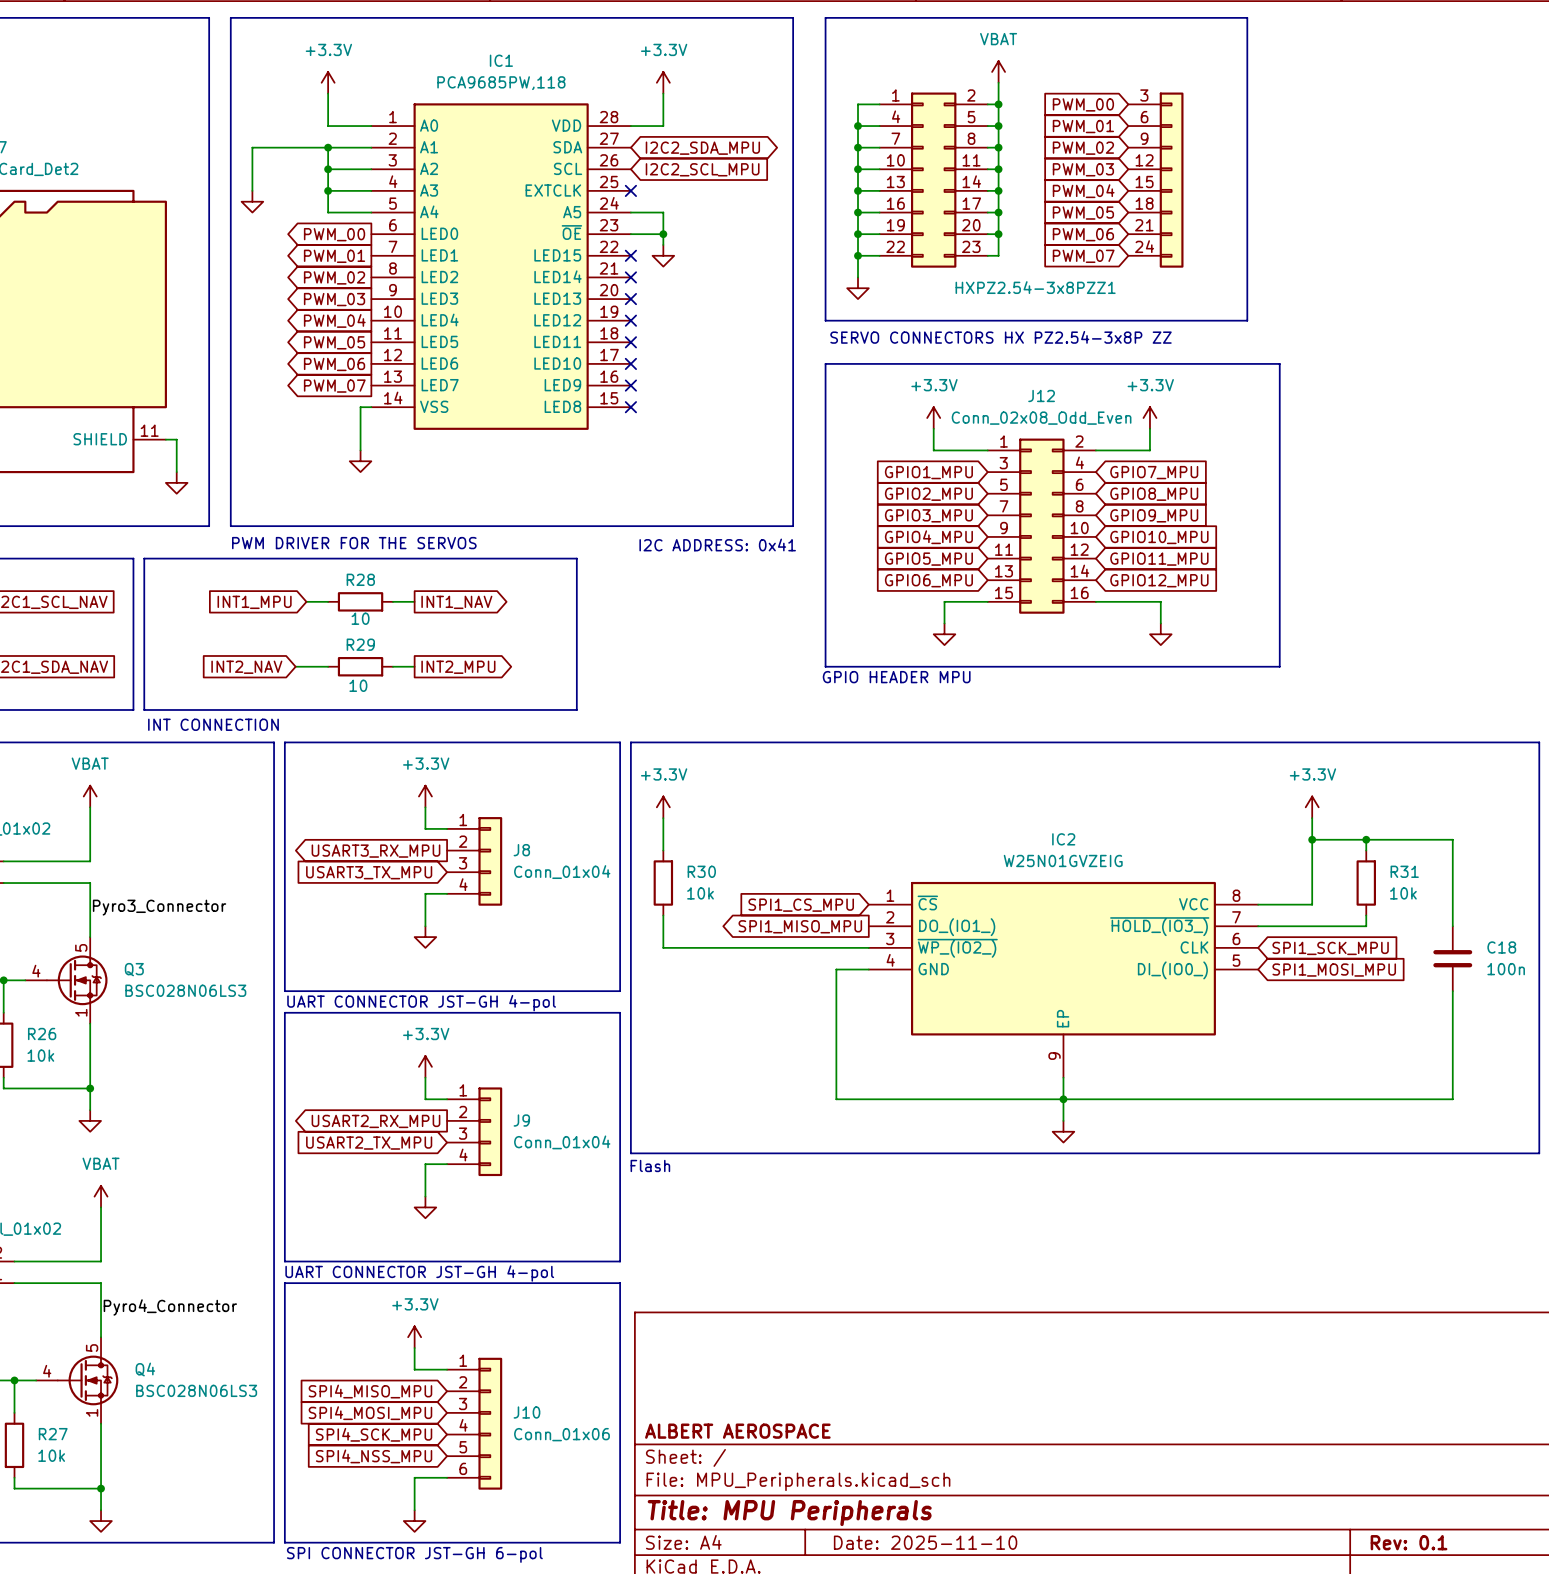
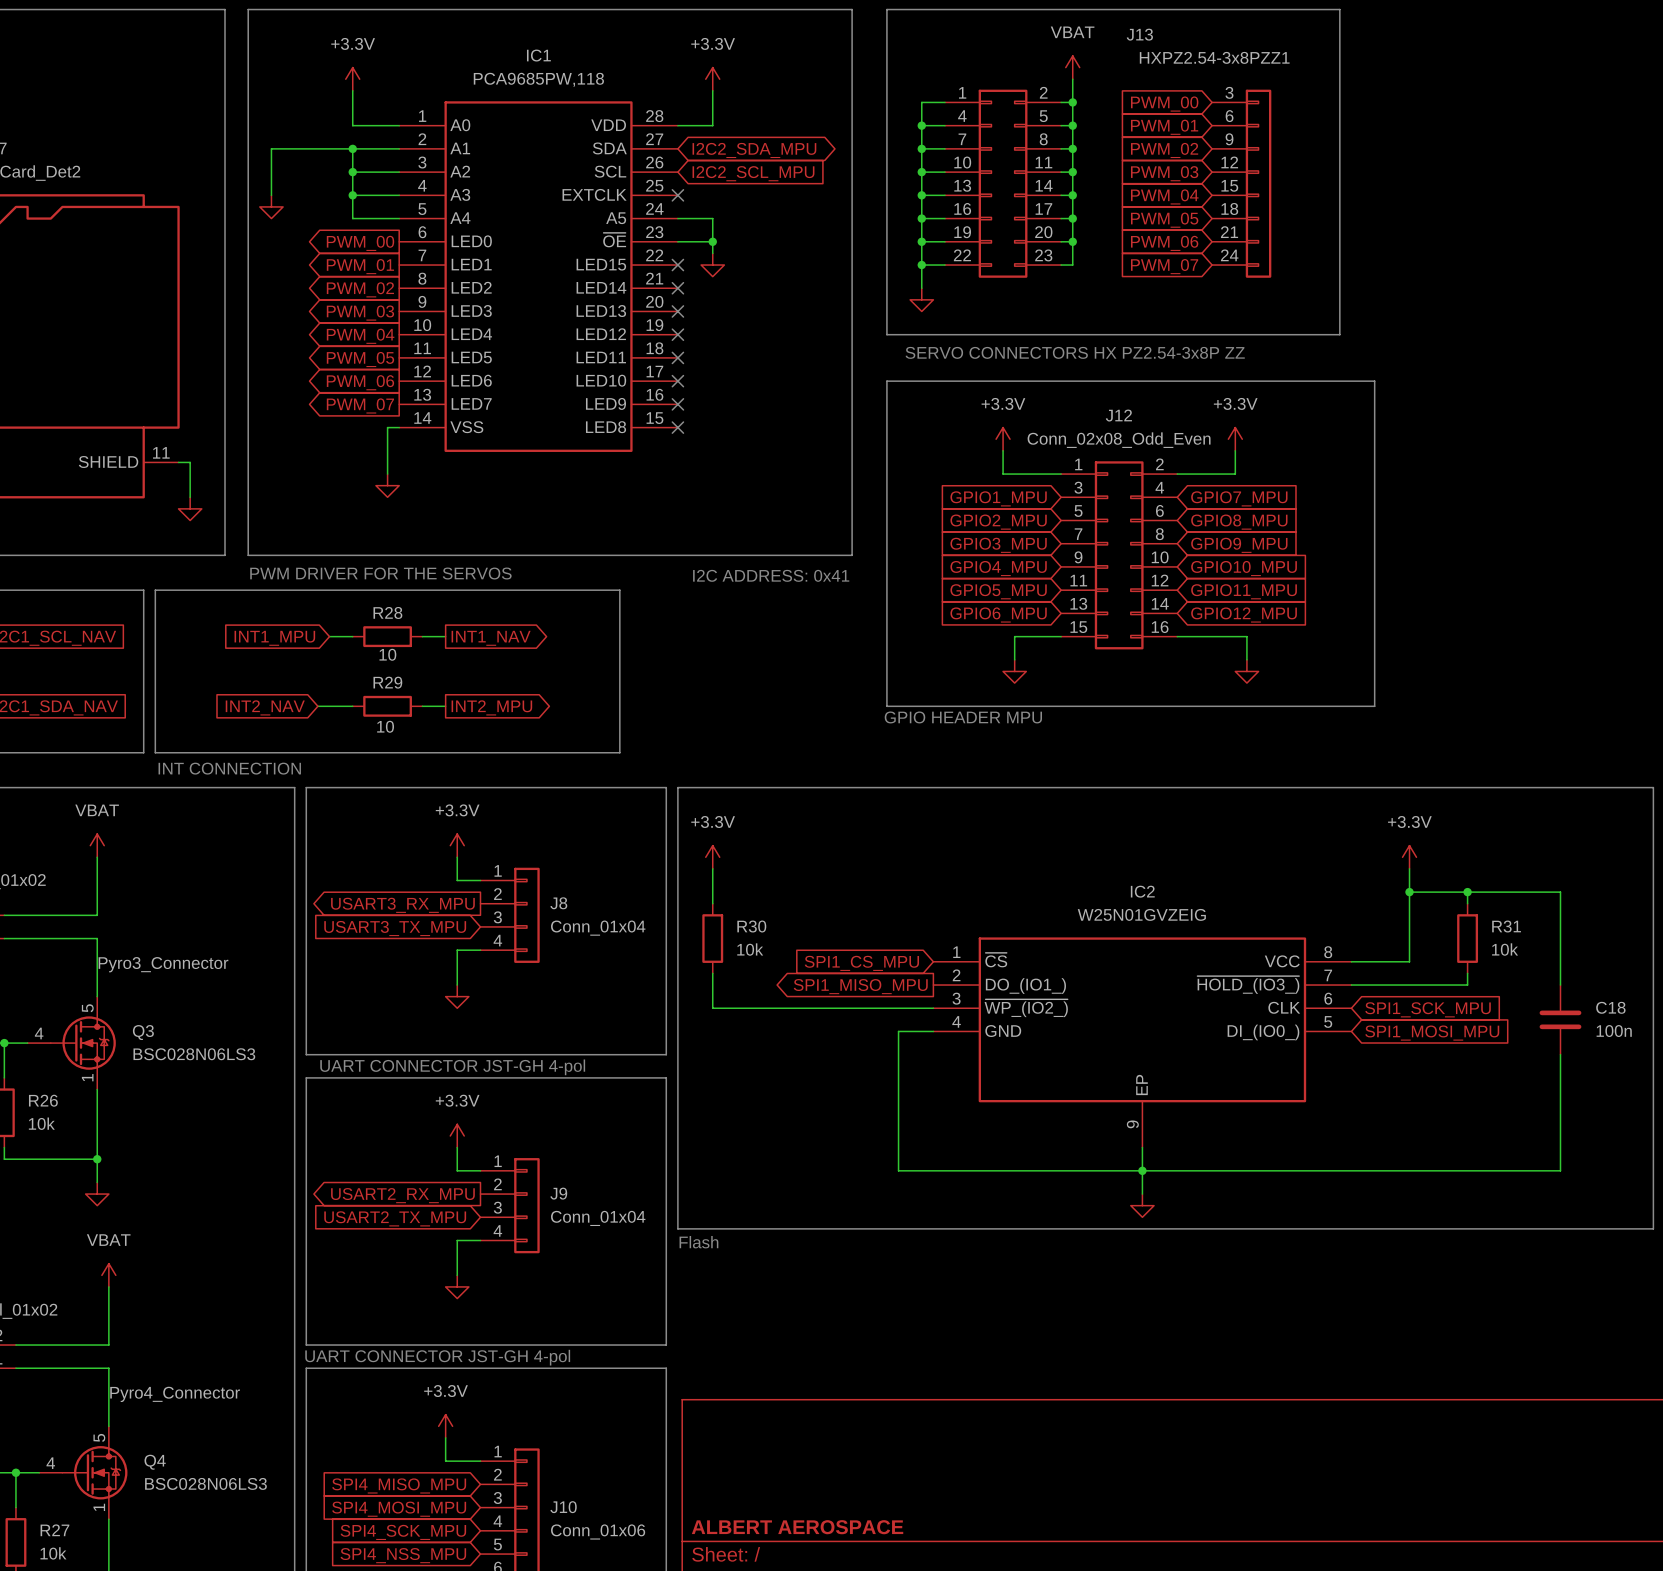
HXPZ2.54-3x8PZZ1 value: none -> HXPZ2.54-3x8PZZ1 (1214, 57)
HXPZ2.54-3x8PZZ1 name: HXPZ2.54-3x8PZZ1 (1035, 287) -> J13 (1139, 34)

